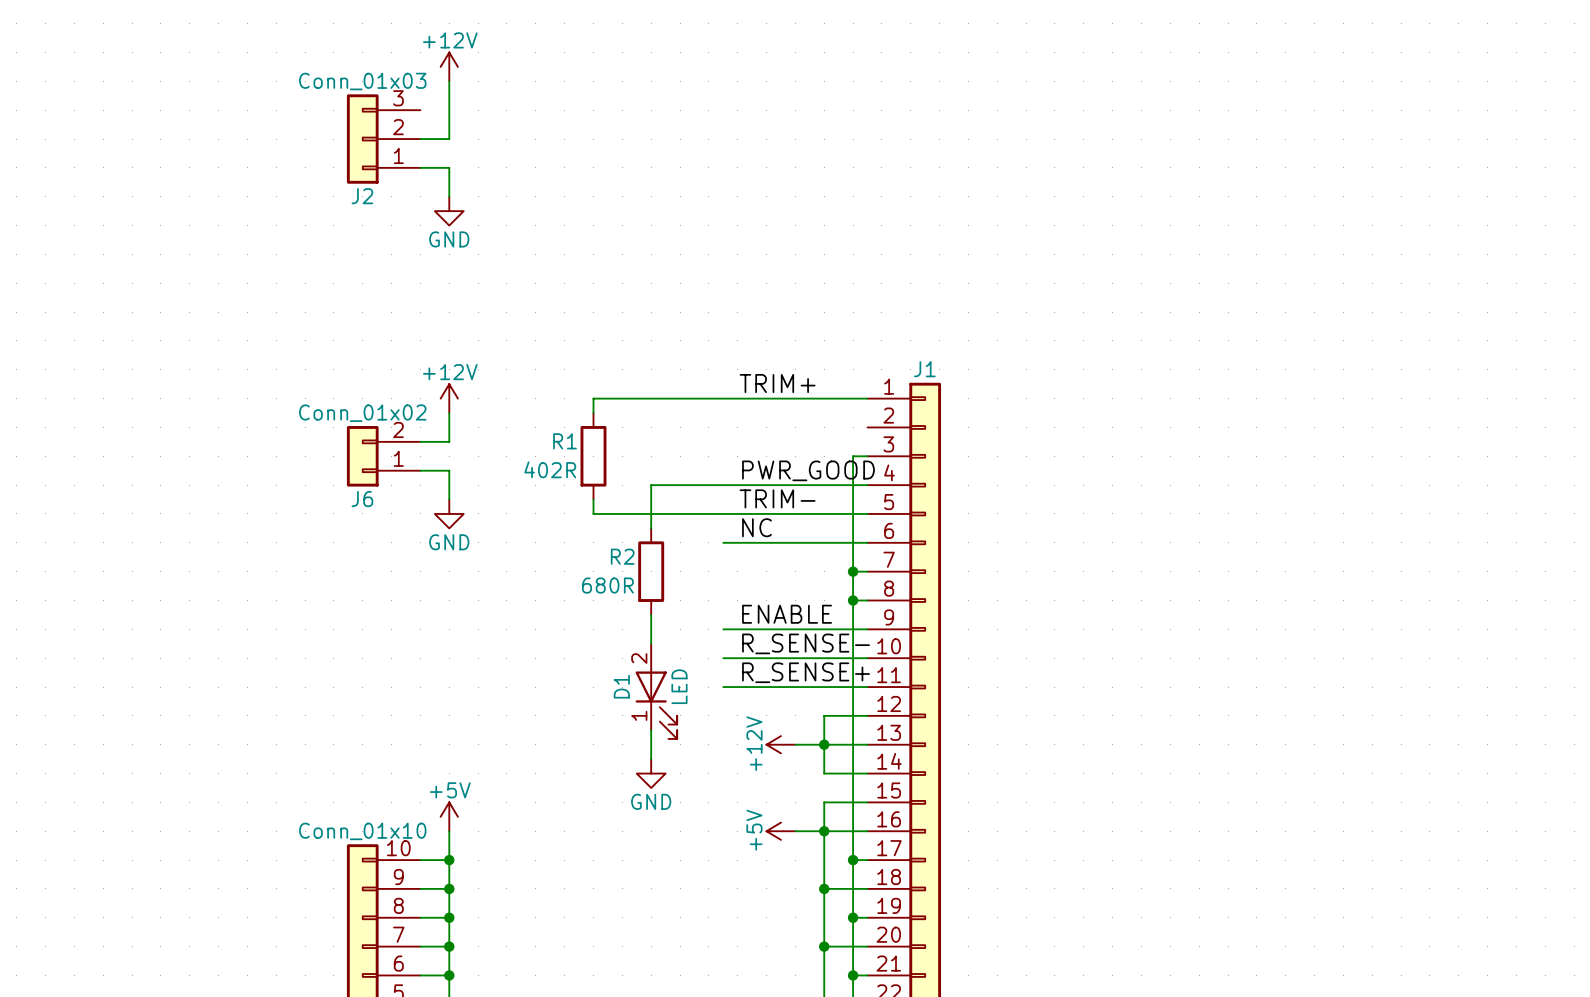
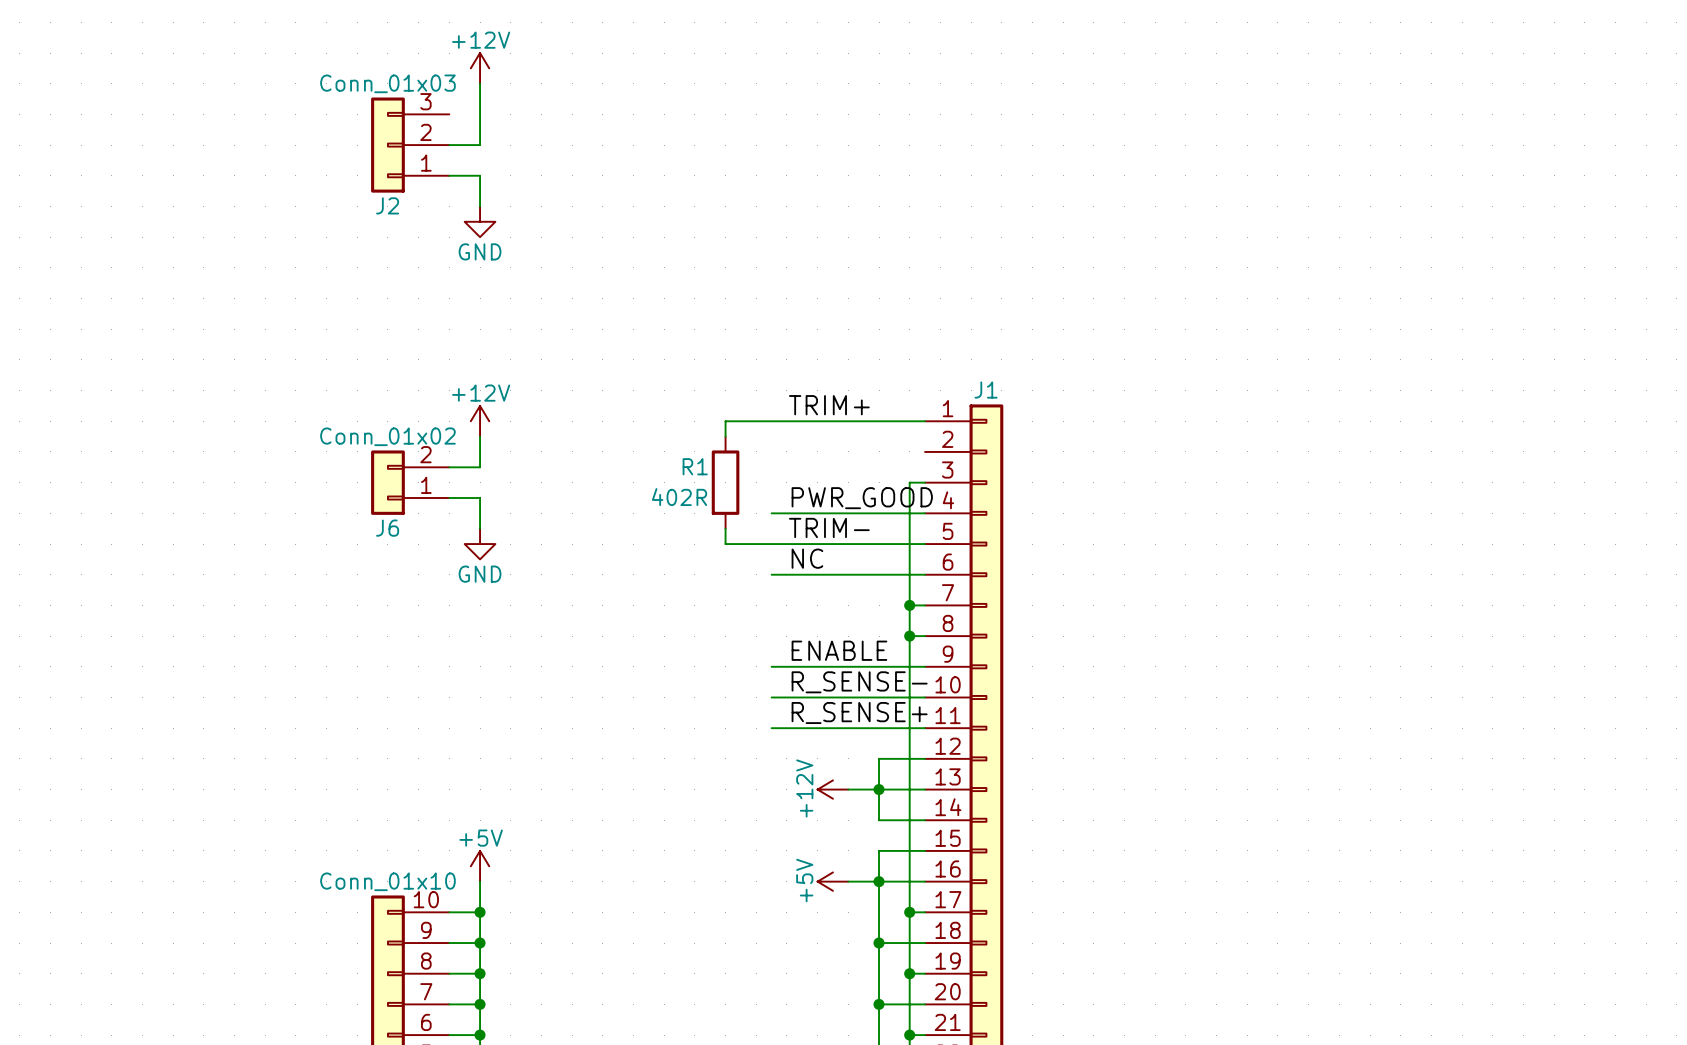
wire: (680, 398) (593, 398) (593, 413) -> (725, 421) (725, 436)
R1 position: (593, 456) -> (725, 482)
wire: (723, 485) (651, 485) (651, 528) -> none
wire: (593, 499) (593, 513) (680, 513) -> (725, 528) (725, 544)
R2: 680R (651, 571) -> none
wire: (651, 614) (651, 643) -> none
D1: LED (656, 691) -> none
wire: (651, 730) (651, 759) -> none
power symbol: GND (651, 773) -> none

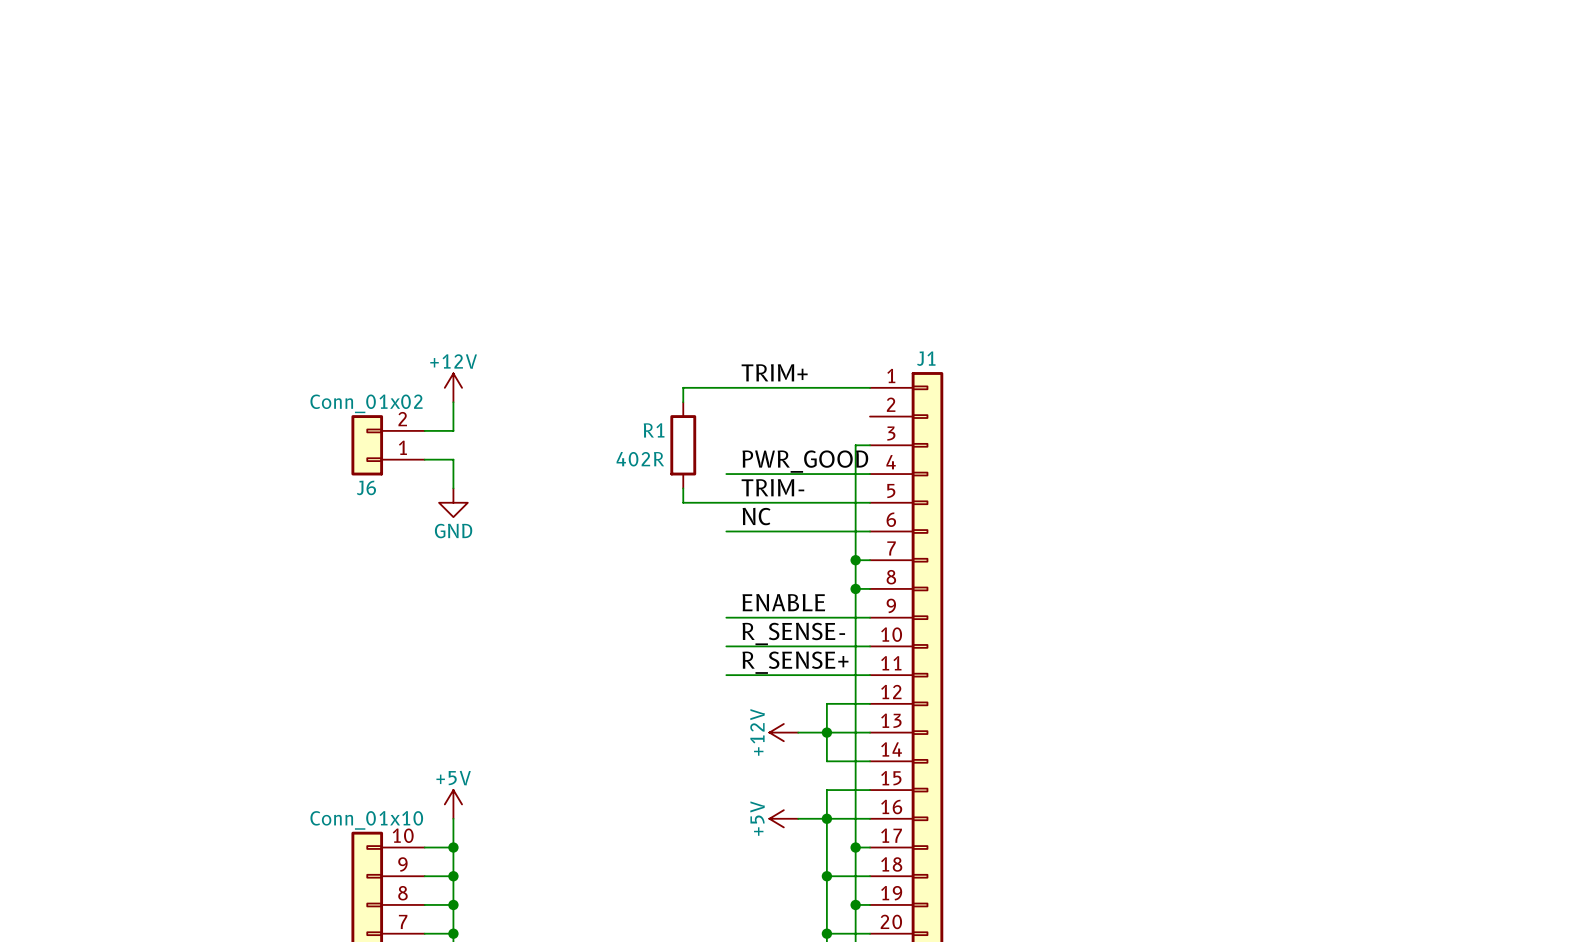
power symbol: +12V (480, 68) -> none
wire: (480, 83) (480, 145) (449, 145) -> none
J2: Conn_01x03 (410, 145) -> none
wire: (449, 175) (480, 175) (480, 206) -> none
power symbol: GND (480, 221) -> none

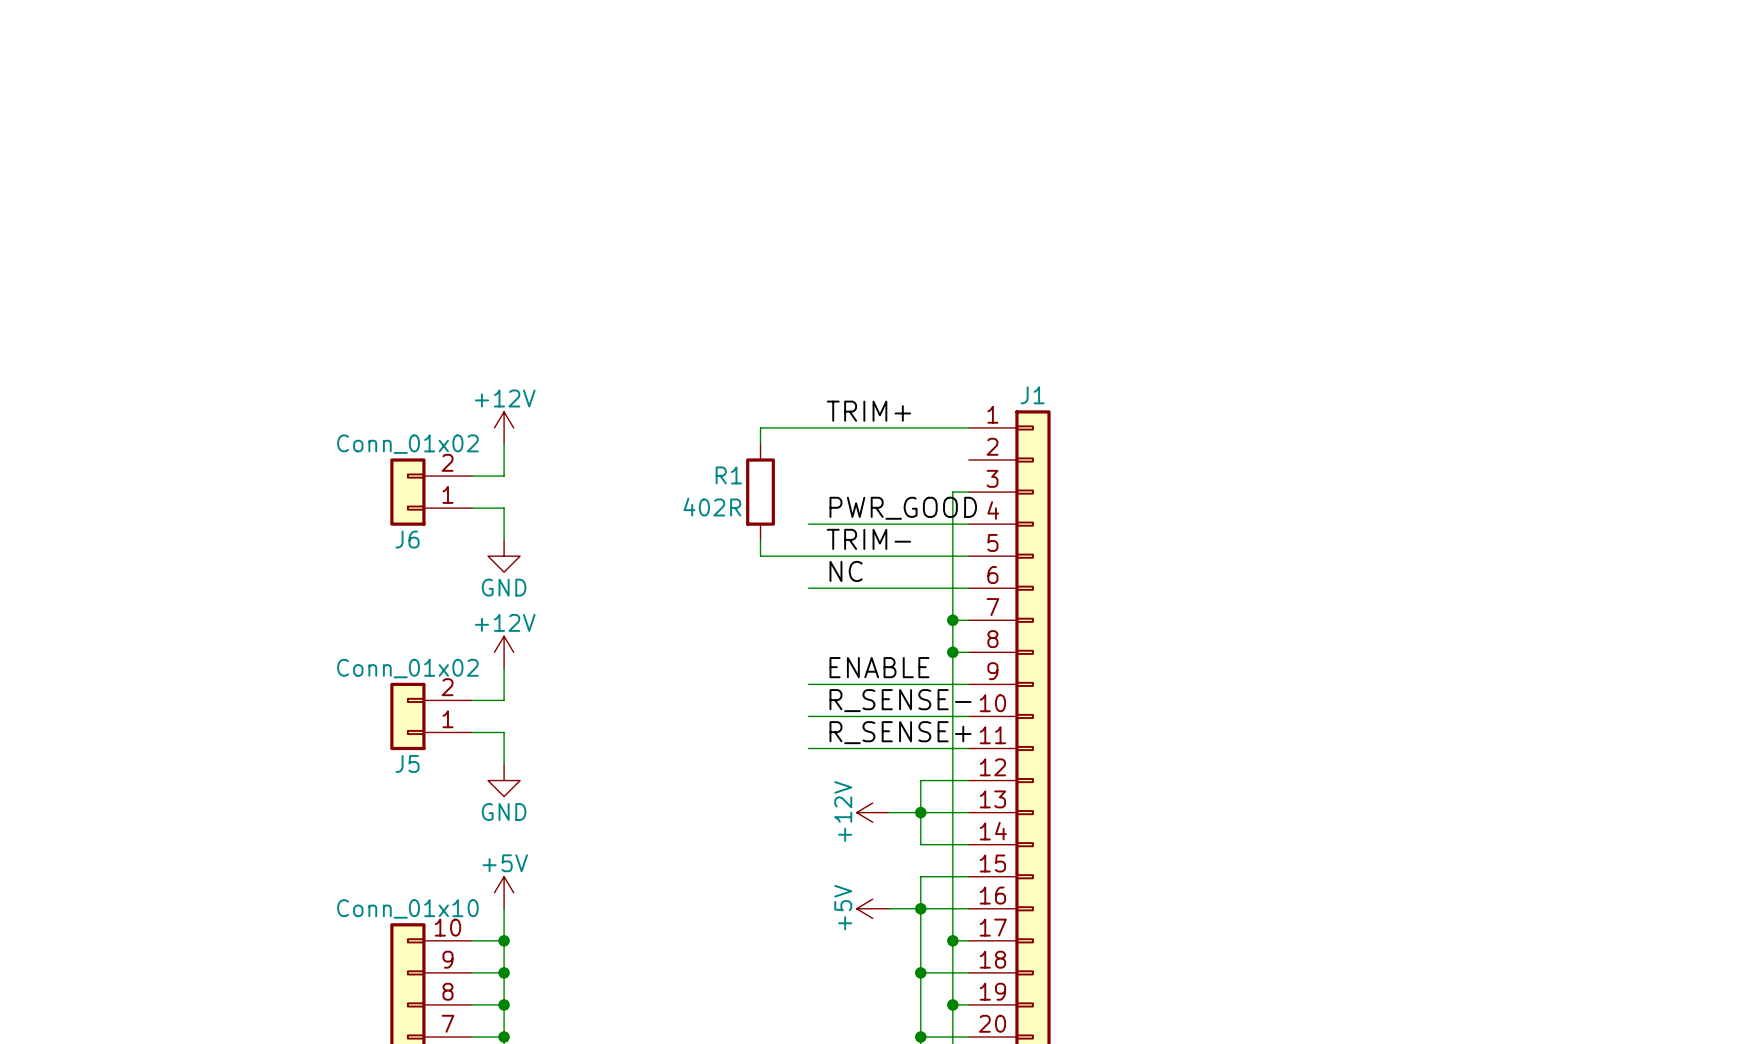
power symbol: none -> +12V (504, 652)
wire: none -> (504, 668) (504, 700) (472, 700)
J5: none -> Conn_01x02 (431, 716)
wire: none -> (472, 732) (504, 732) (504, 764)
power symbol: none -> GND (504, 780)

